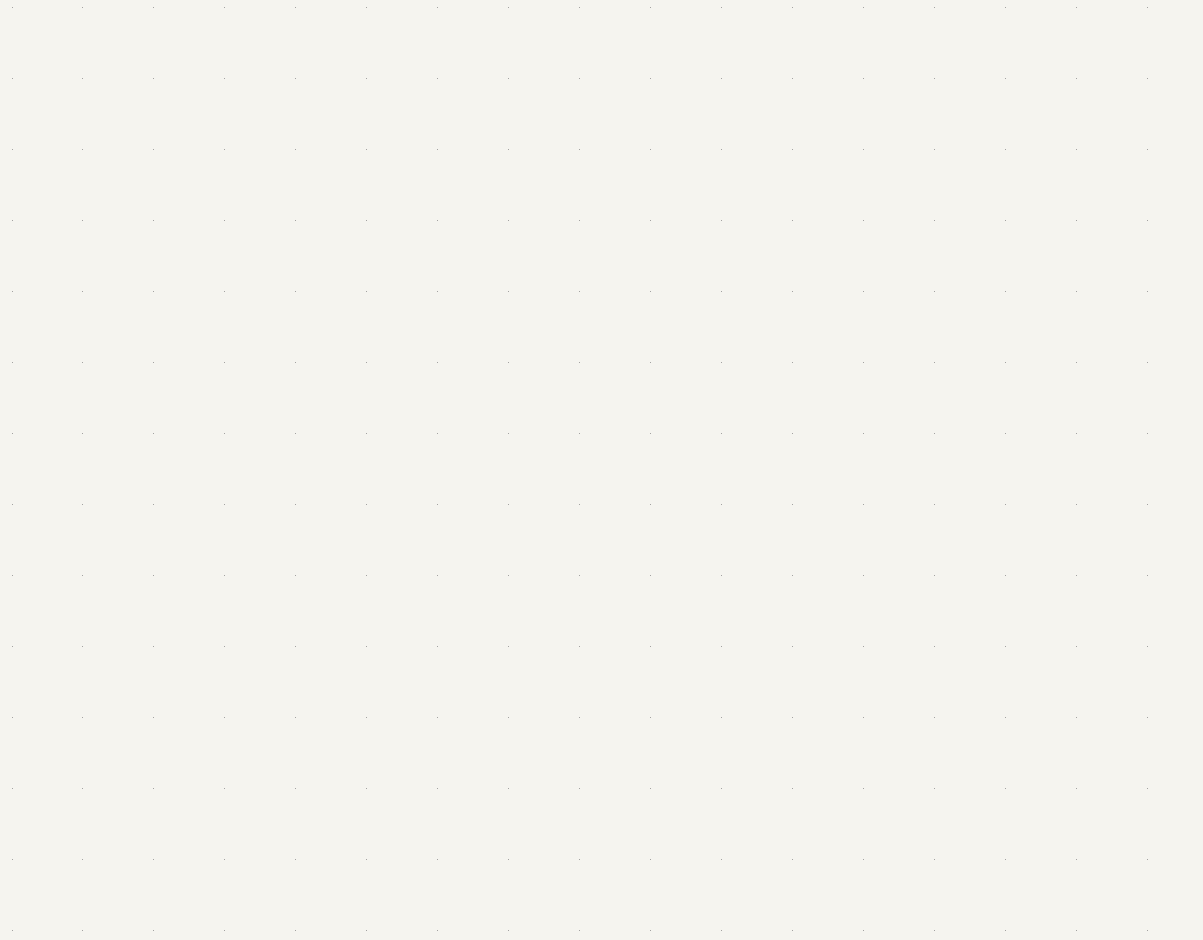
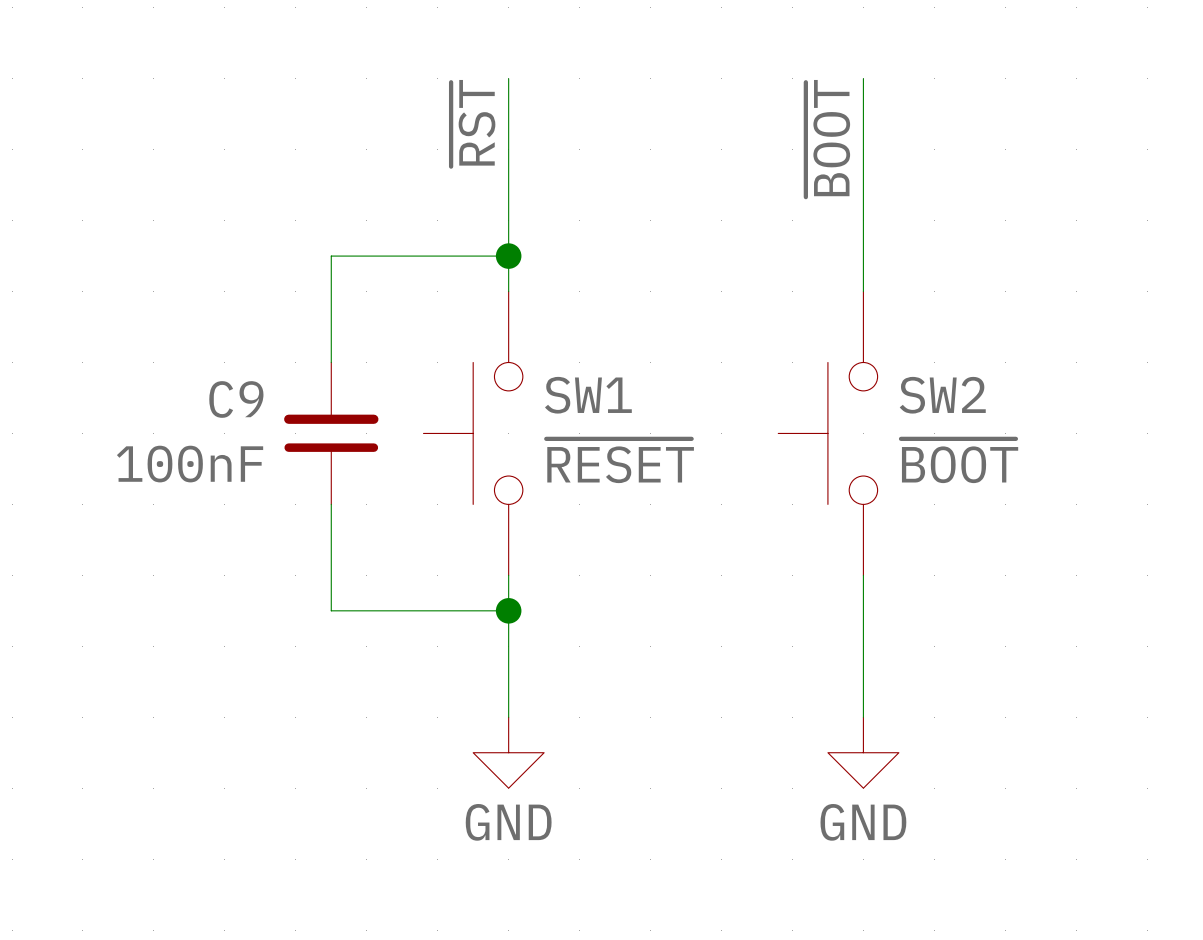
wire: none -> (508, 78) (508, 291)
wire: none -> (863, 78) (863, 291)
label: none -> ~{RST} (473, 123)
label: none -> ~{BOOT} (827, 138)
wire: none -> (508, 256) (331, 256) (331, 362)
junction: none -> (508, 256)
C9: none -> 100nF (331, 433)
SW1: none -> ~{RESET} (473, 433)
SW2: none -> ~{BOOT} (827, 433)
wire: none -> (331, 504) (331, 610) (508, 610)
wire: none -> (508, 575) (508, 717)
wire: none -> (863, 575) (863, 717)
junction: none -> (508, 610)
power symbol: none -> GND (508, 752)
power symbol: none -> GND (863, 752)

